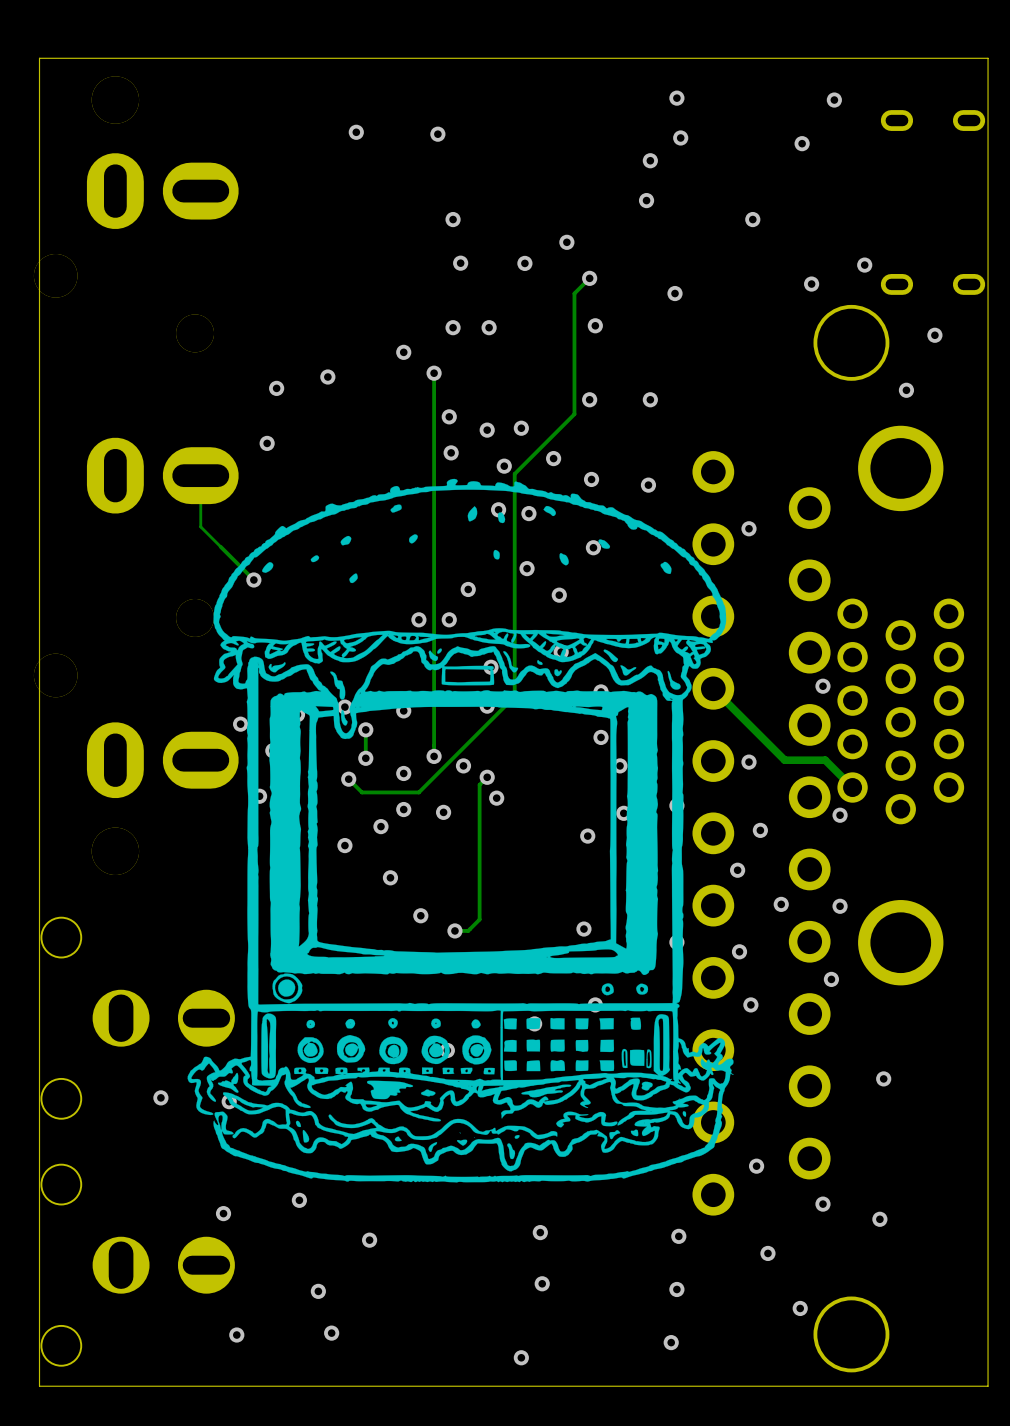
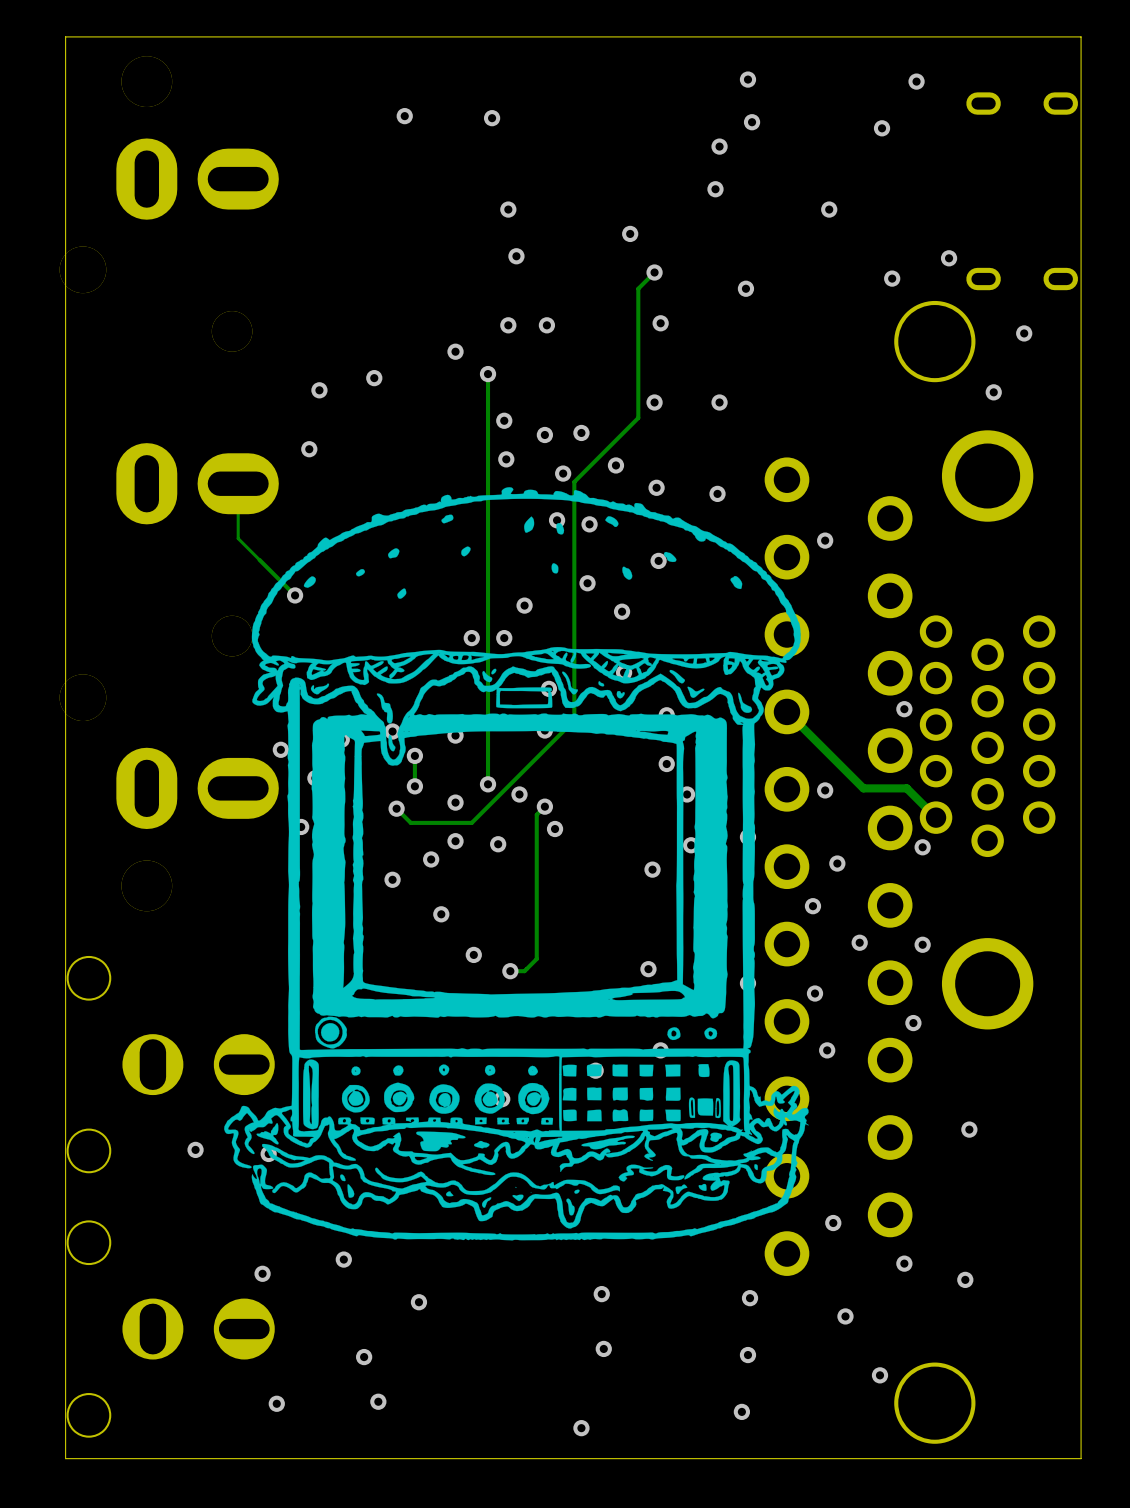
via: (524, 263) -> none

